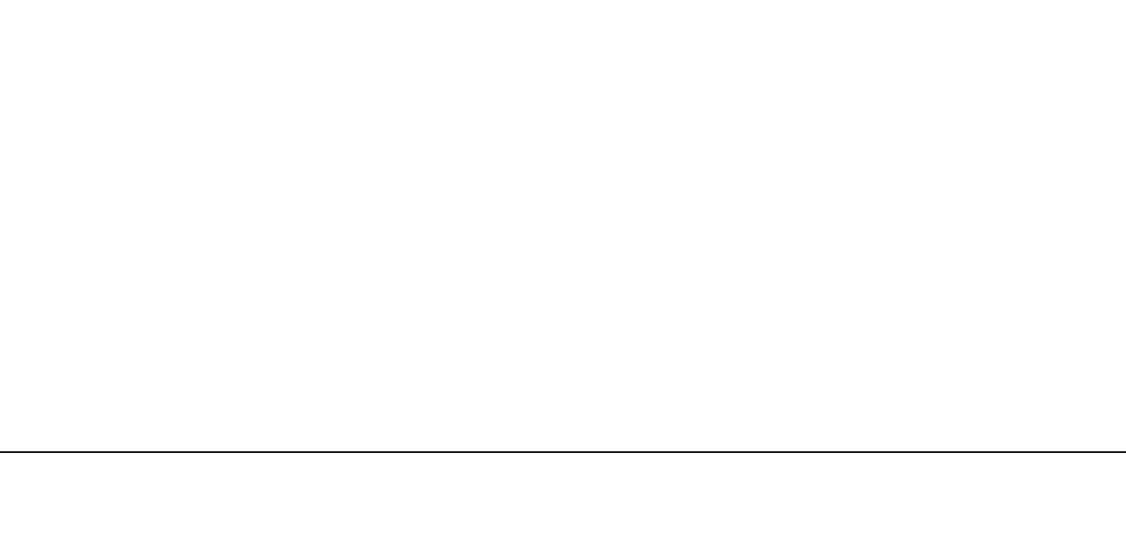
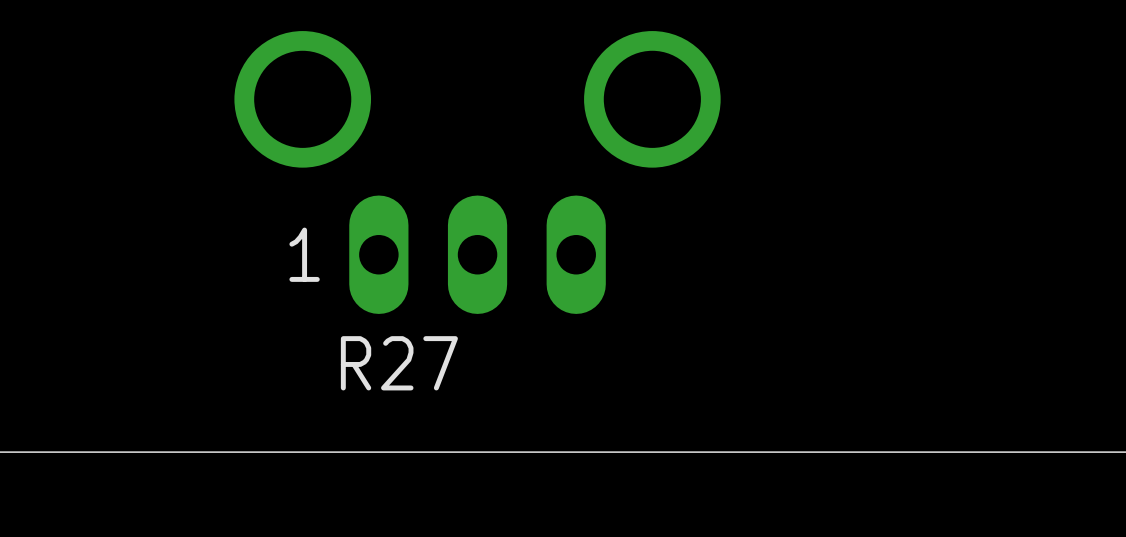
R27: none -> (477, 172)

